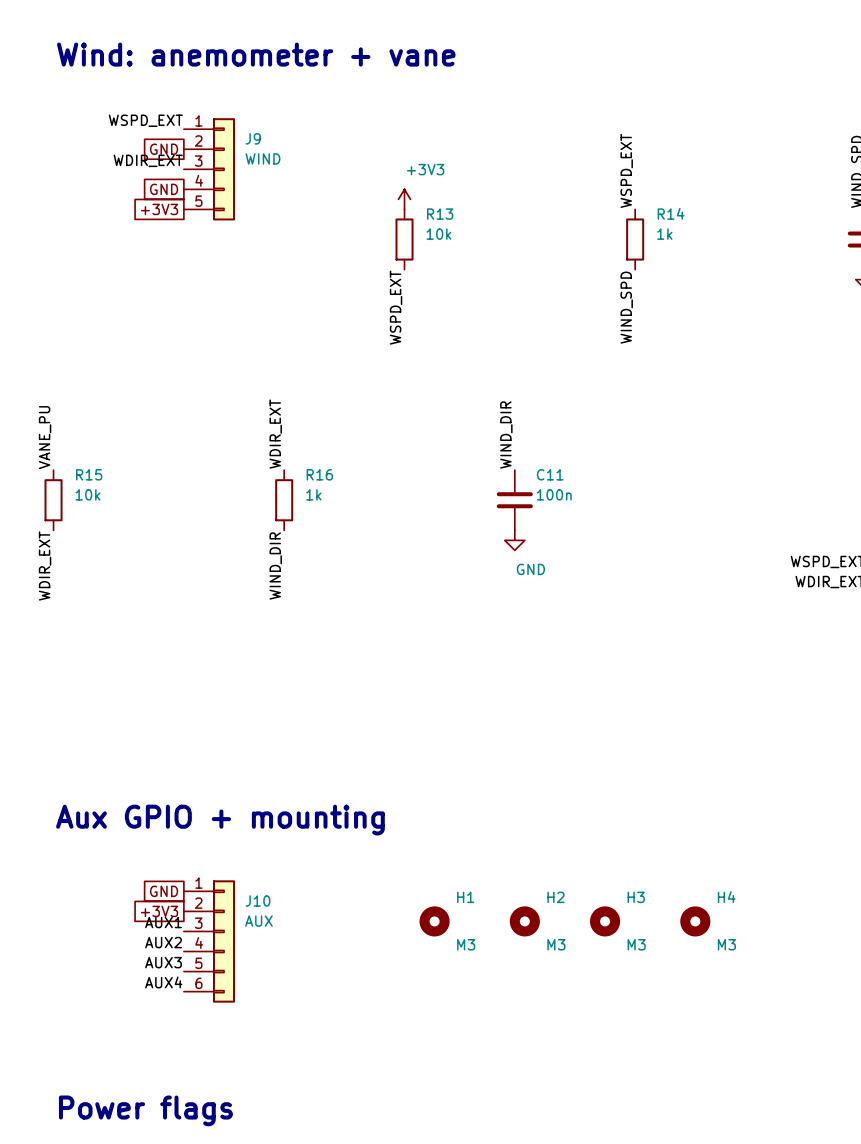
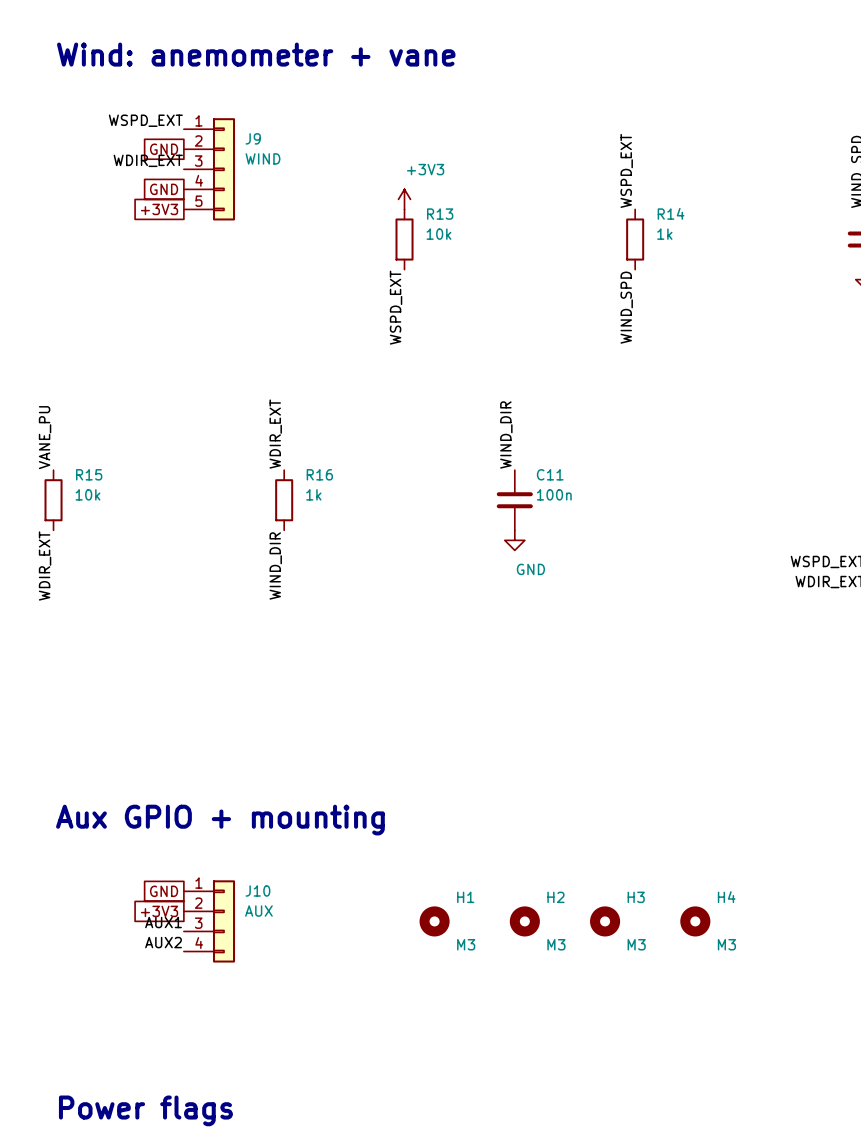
J10 symbol: [183, 880, 236, 1003] -> [183, 880, 236, 963]
label: AUX3 (163, 962) -> none
label: AUX4 (163, 982) -> none

